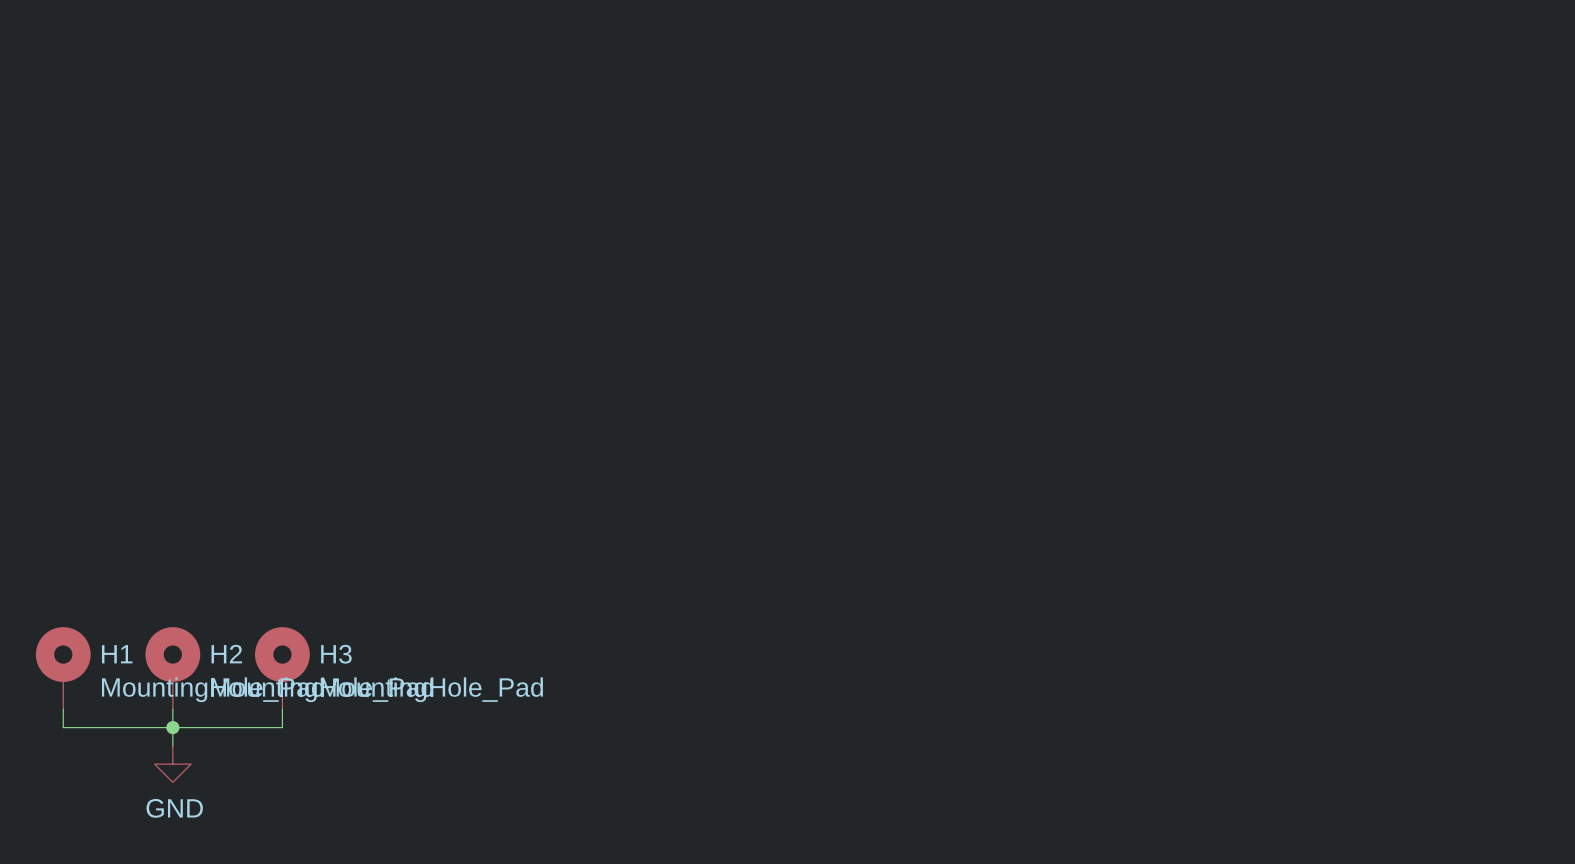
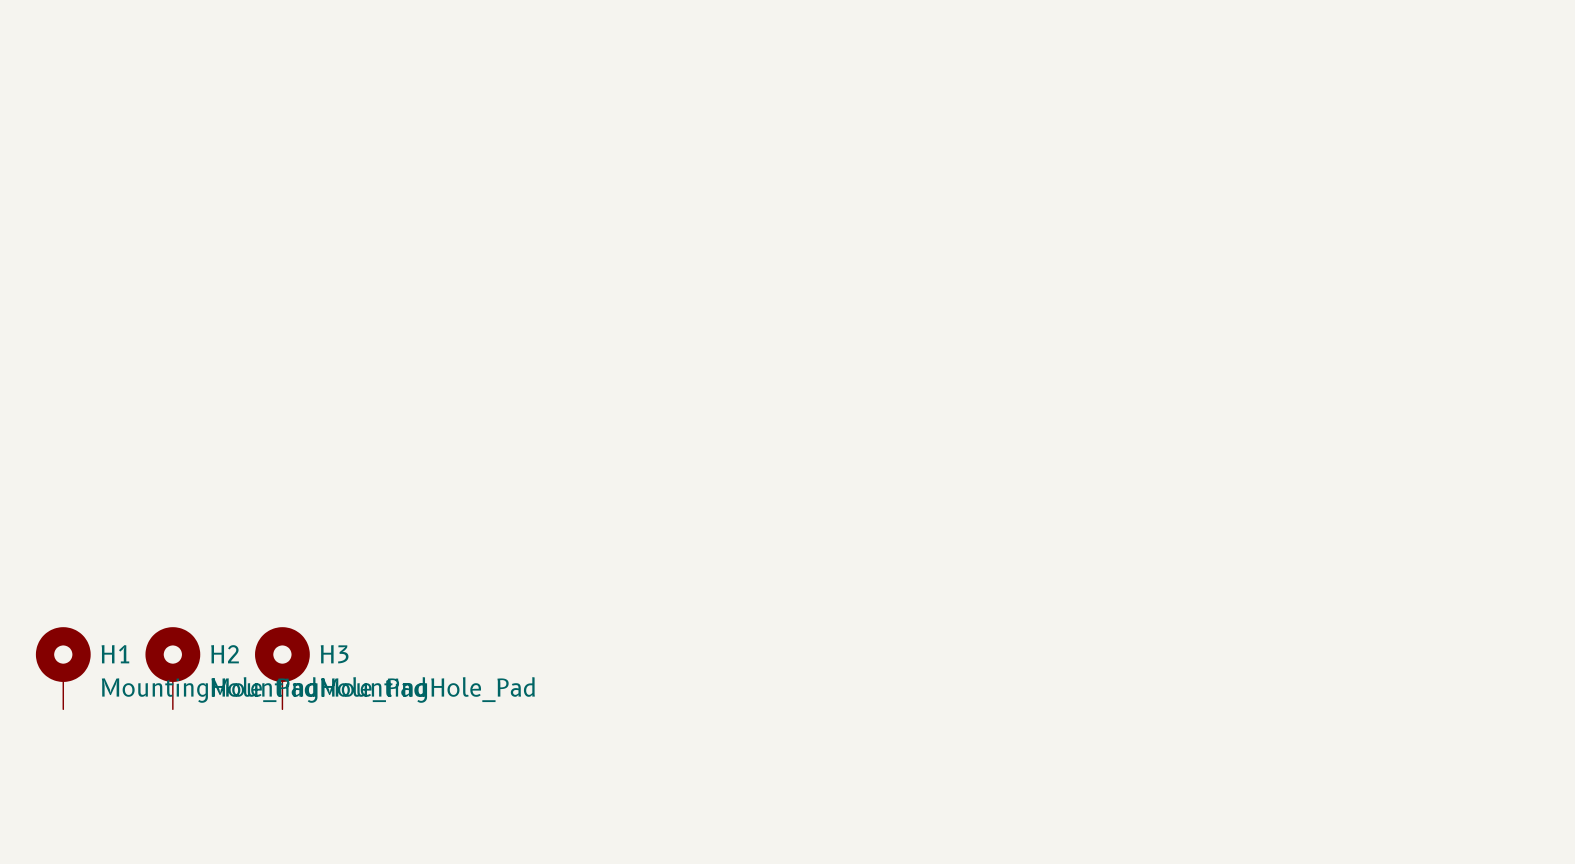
wire: (63, 709) (63, 727) (282, 727) (282, 709) -> none
wire: (172, 709) (172, 745) -> none
junction: (172, 727) -> none
power symbol: GND (172, 764) -> none

